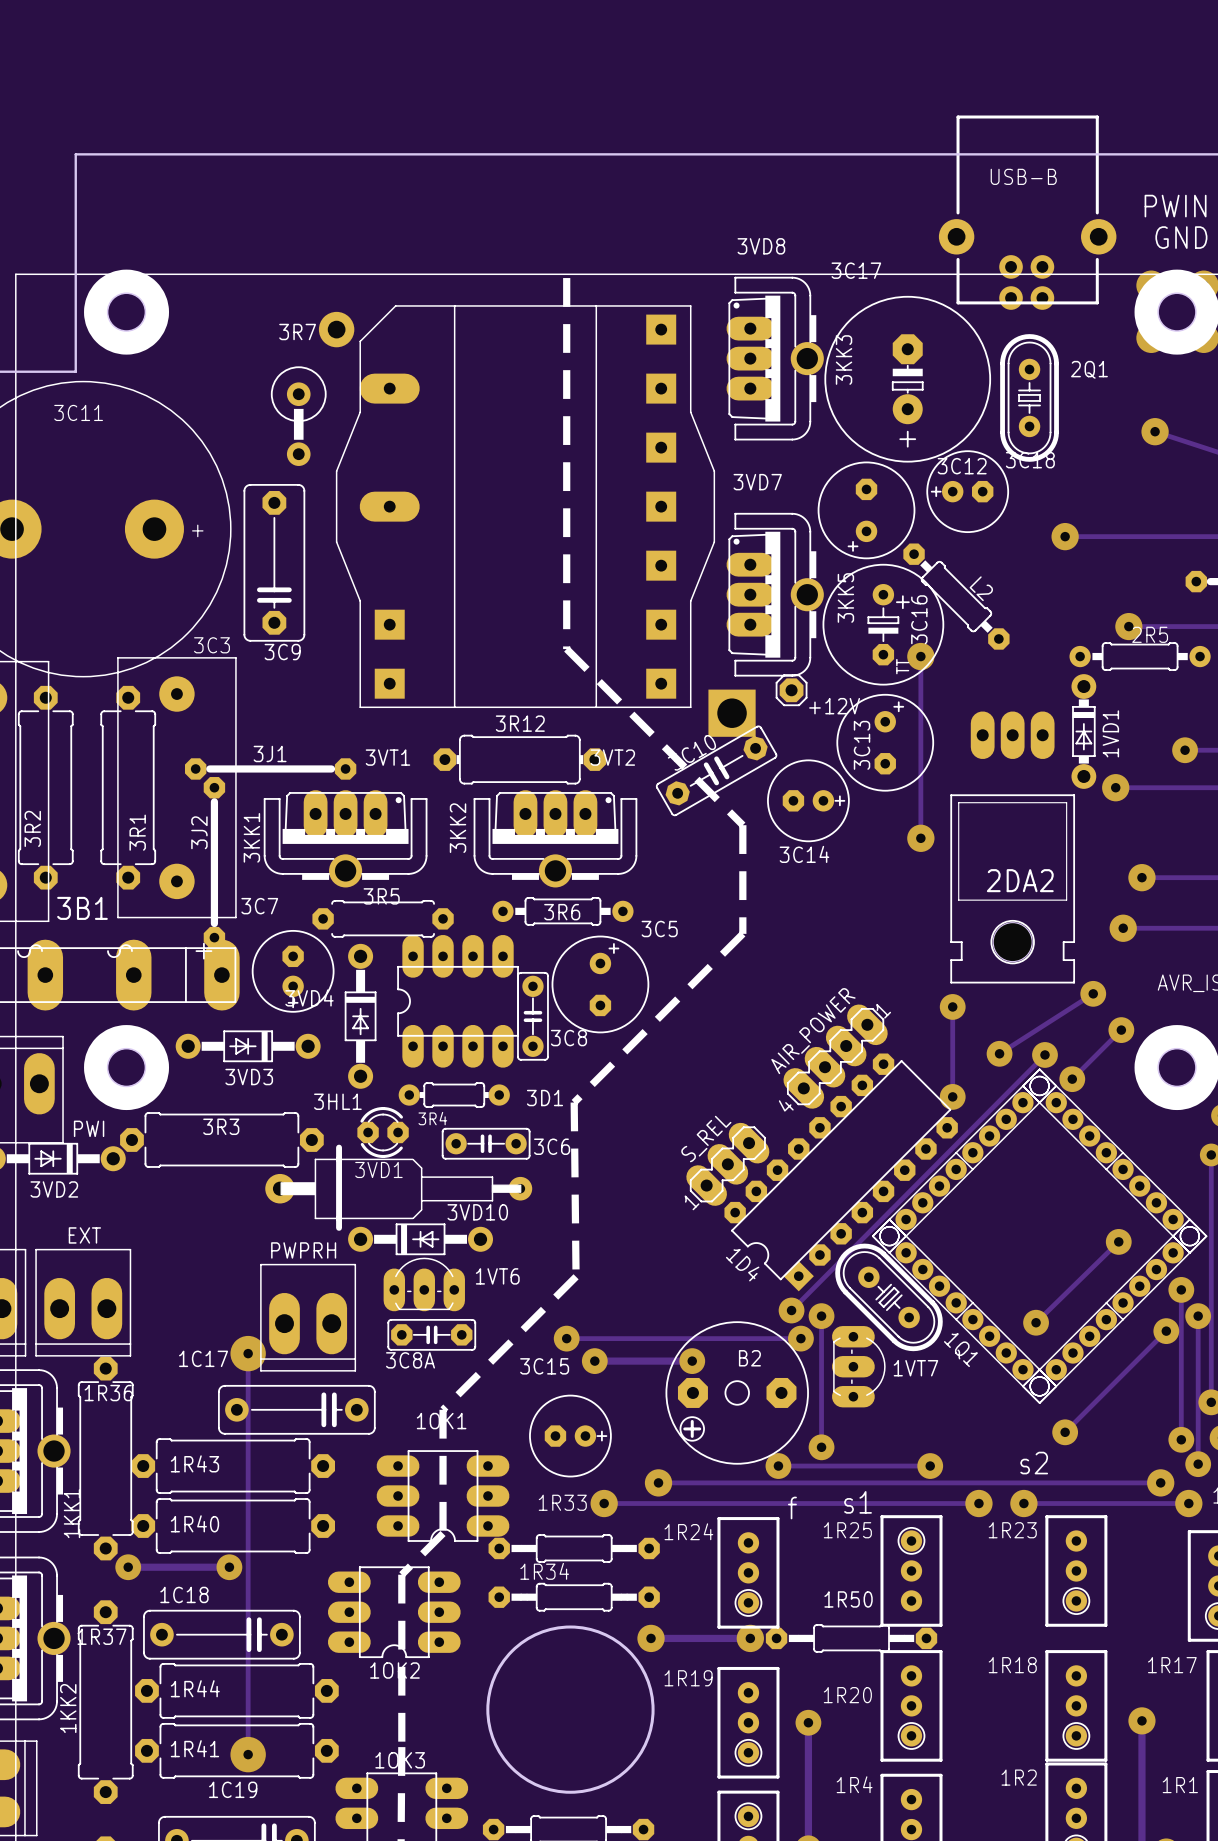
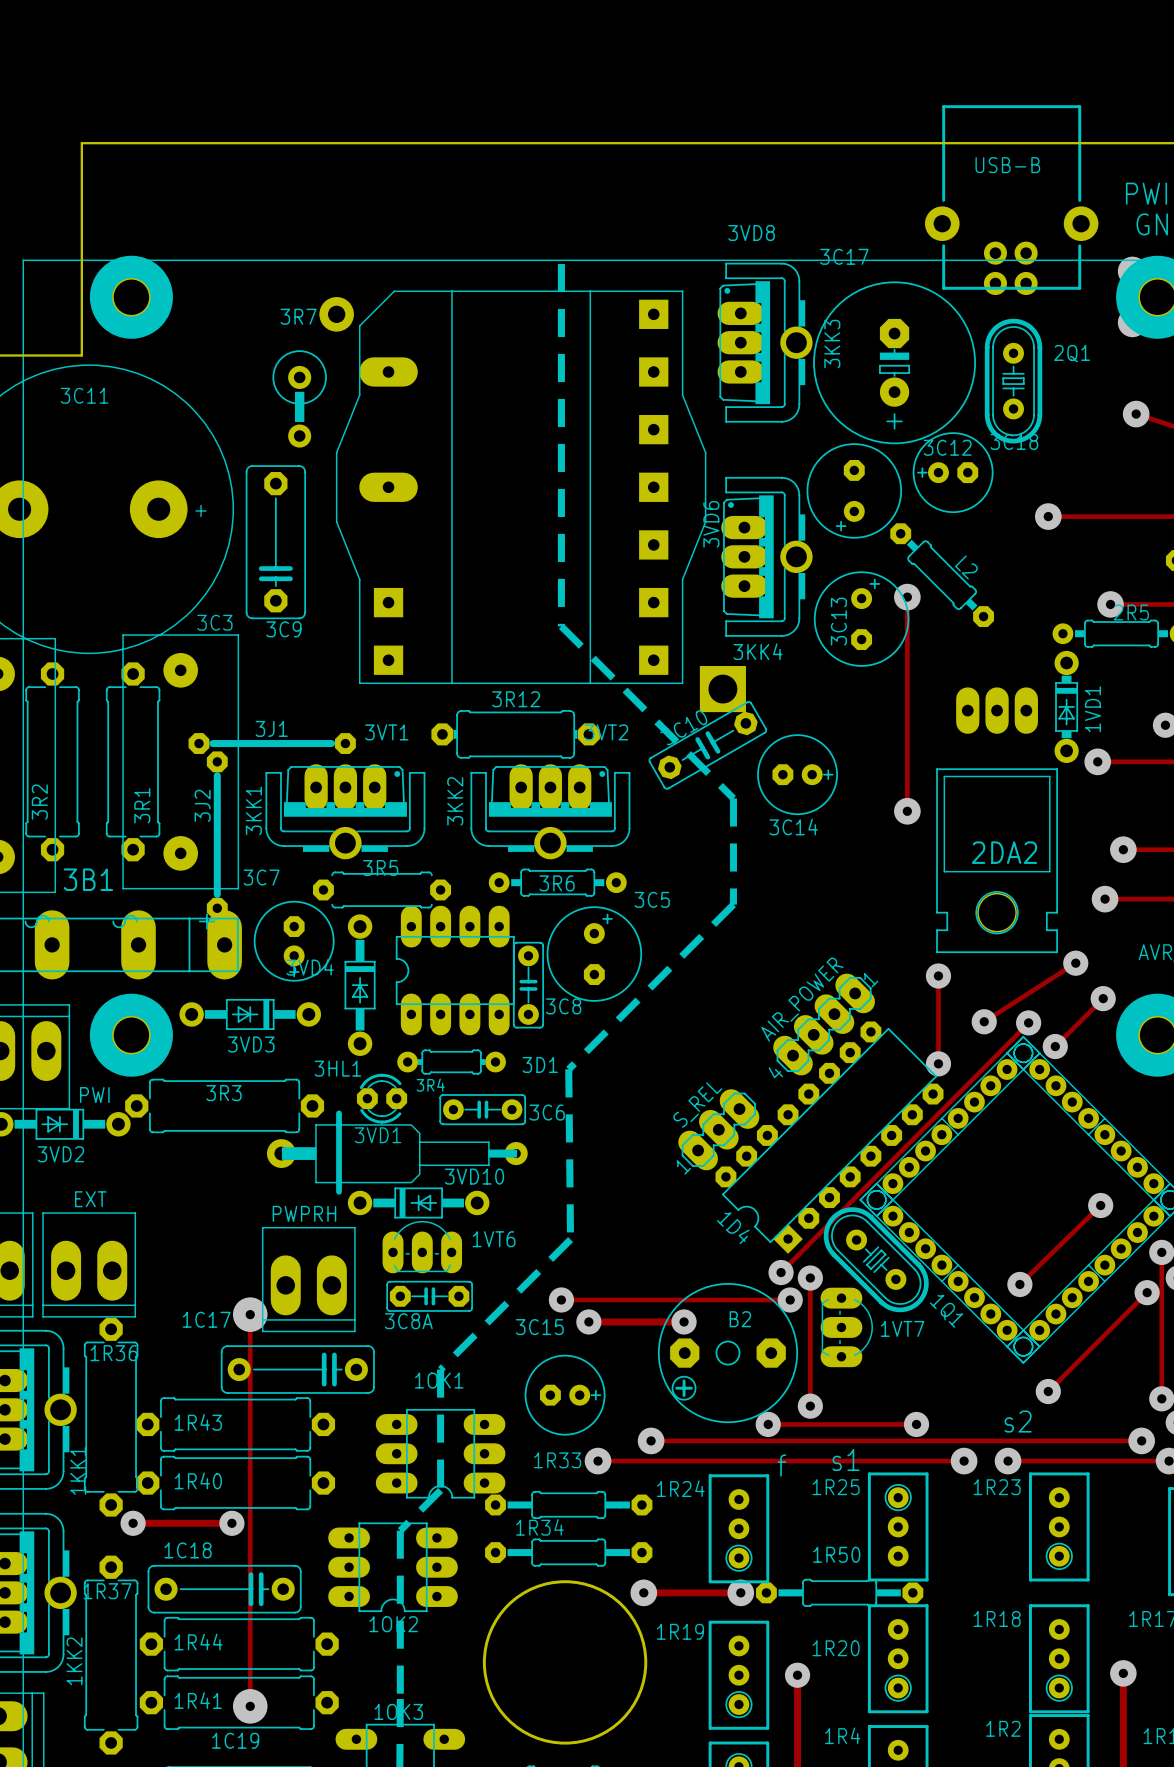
3VD6: none -> (747, 556)
3KK4: none -> (768, 556)
3VD7: (753, 594) -> none
3KK5: (779, 594) -> none
track: none -> (907, 597) (907, 633)
3C16: (883, 624) -> none
via position: (920, 656) -> (907, 597)
+12V: (791, 690) -> none
3C13 position: (885, 742) -> (861, 619)

